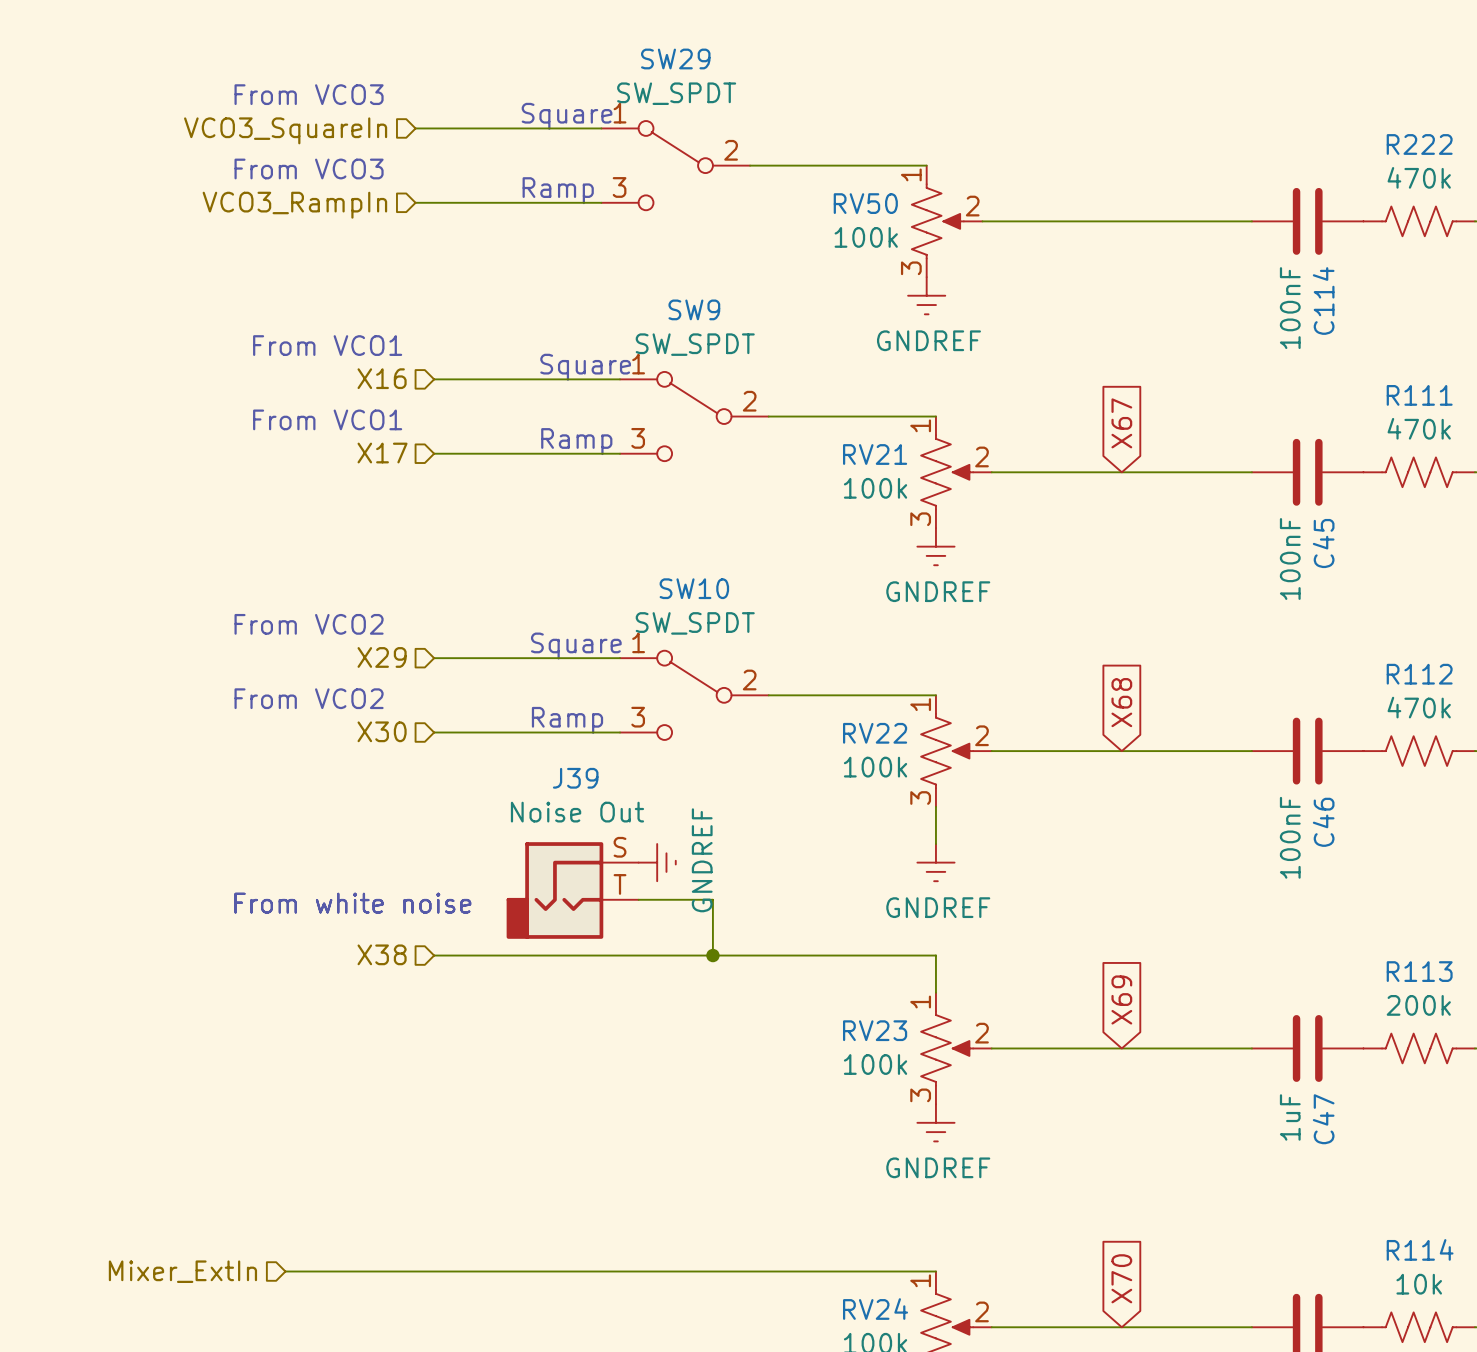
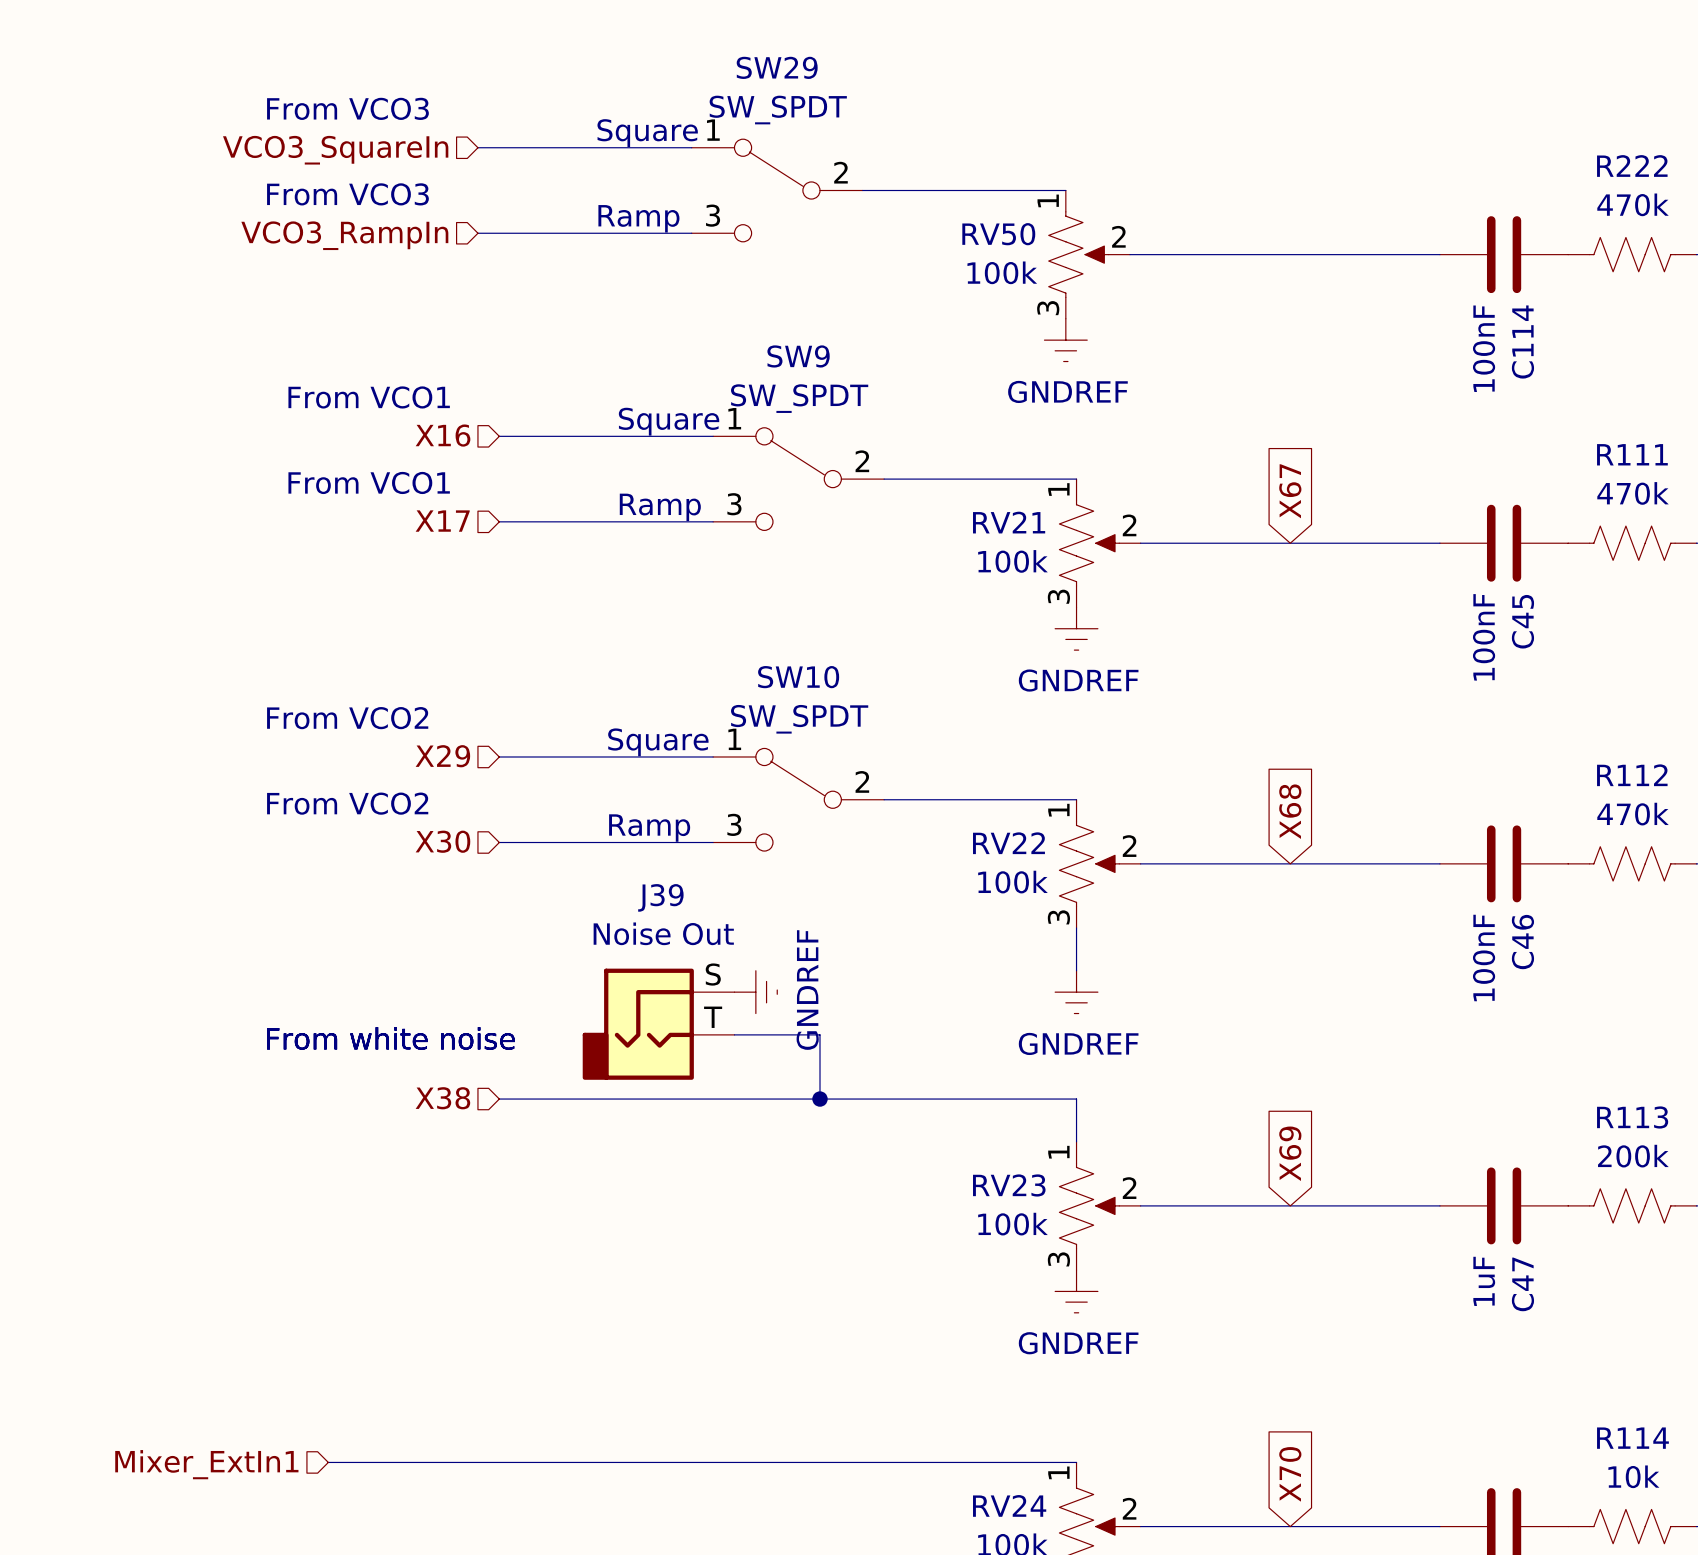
hierarchical label: Mixer_ExtIn (182, 1271) -> Mixer_ExtIn1 (206, 1464)

